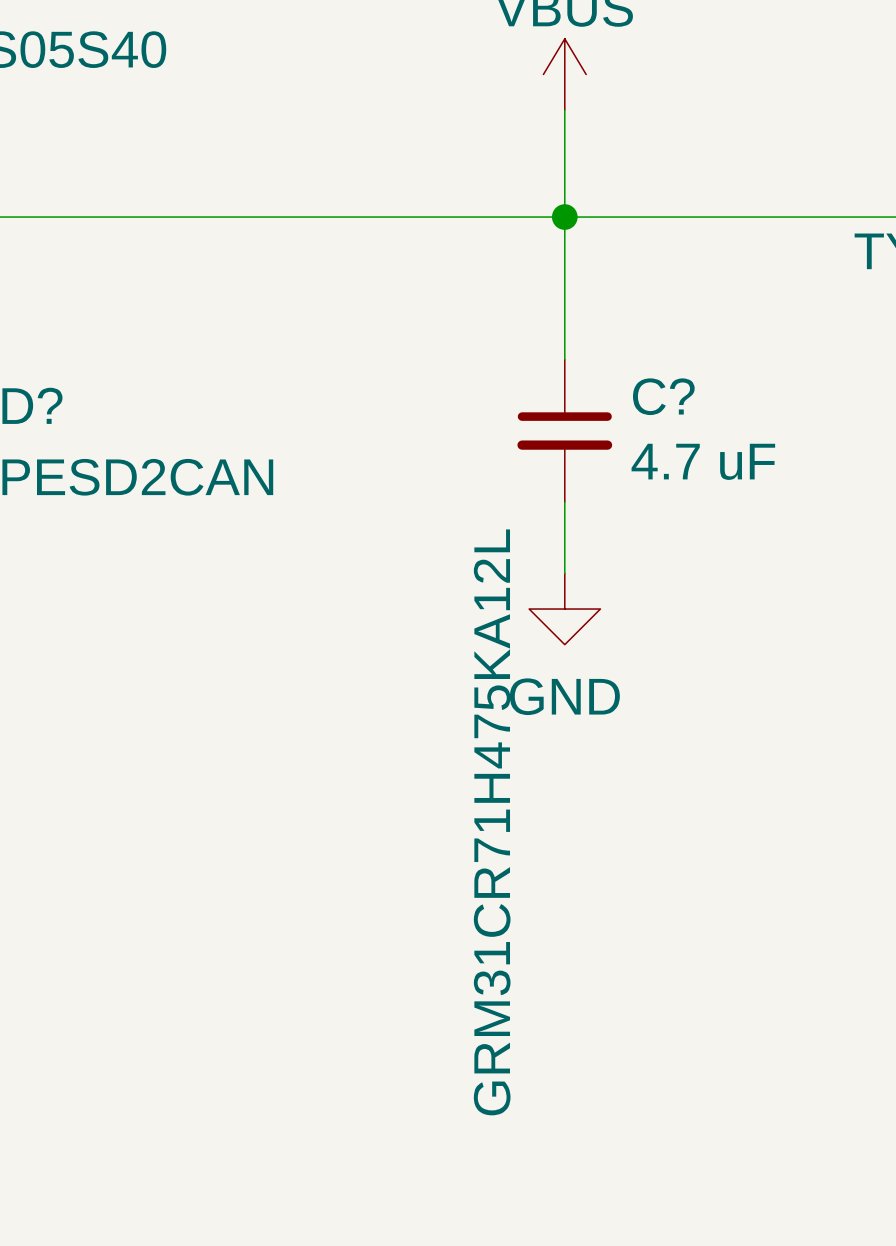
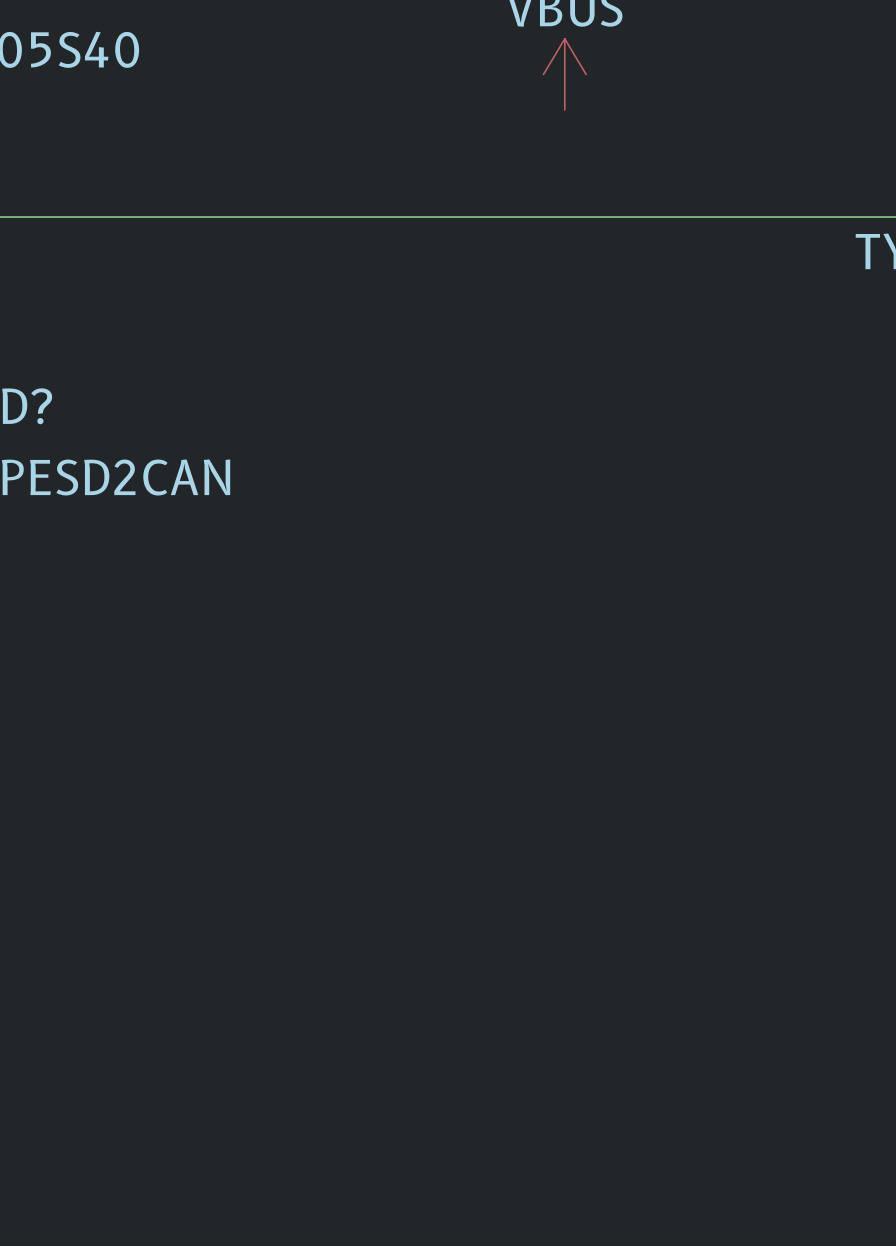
wire: (564, 110) (564, 359) -> none
junction: (564, 217) -> none
C?: 4.7 uF (564, 430) -> none
wire: (564, 502) (564, 573) -> none
power symbol: GND (564, 609) -> none

